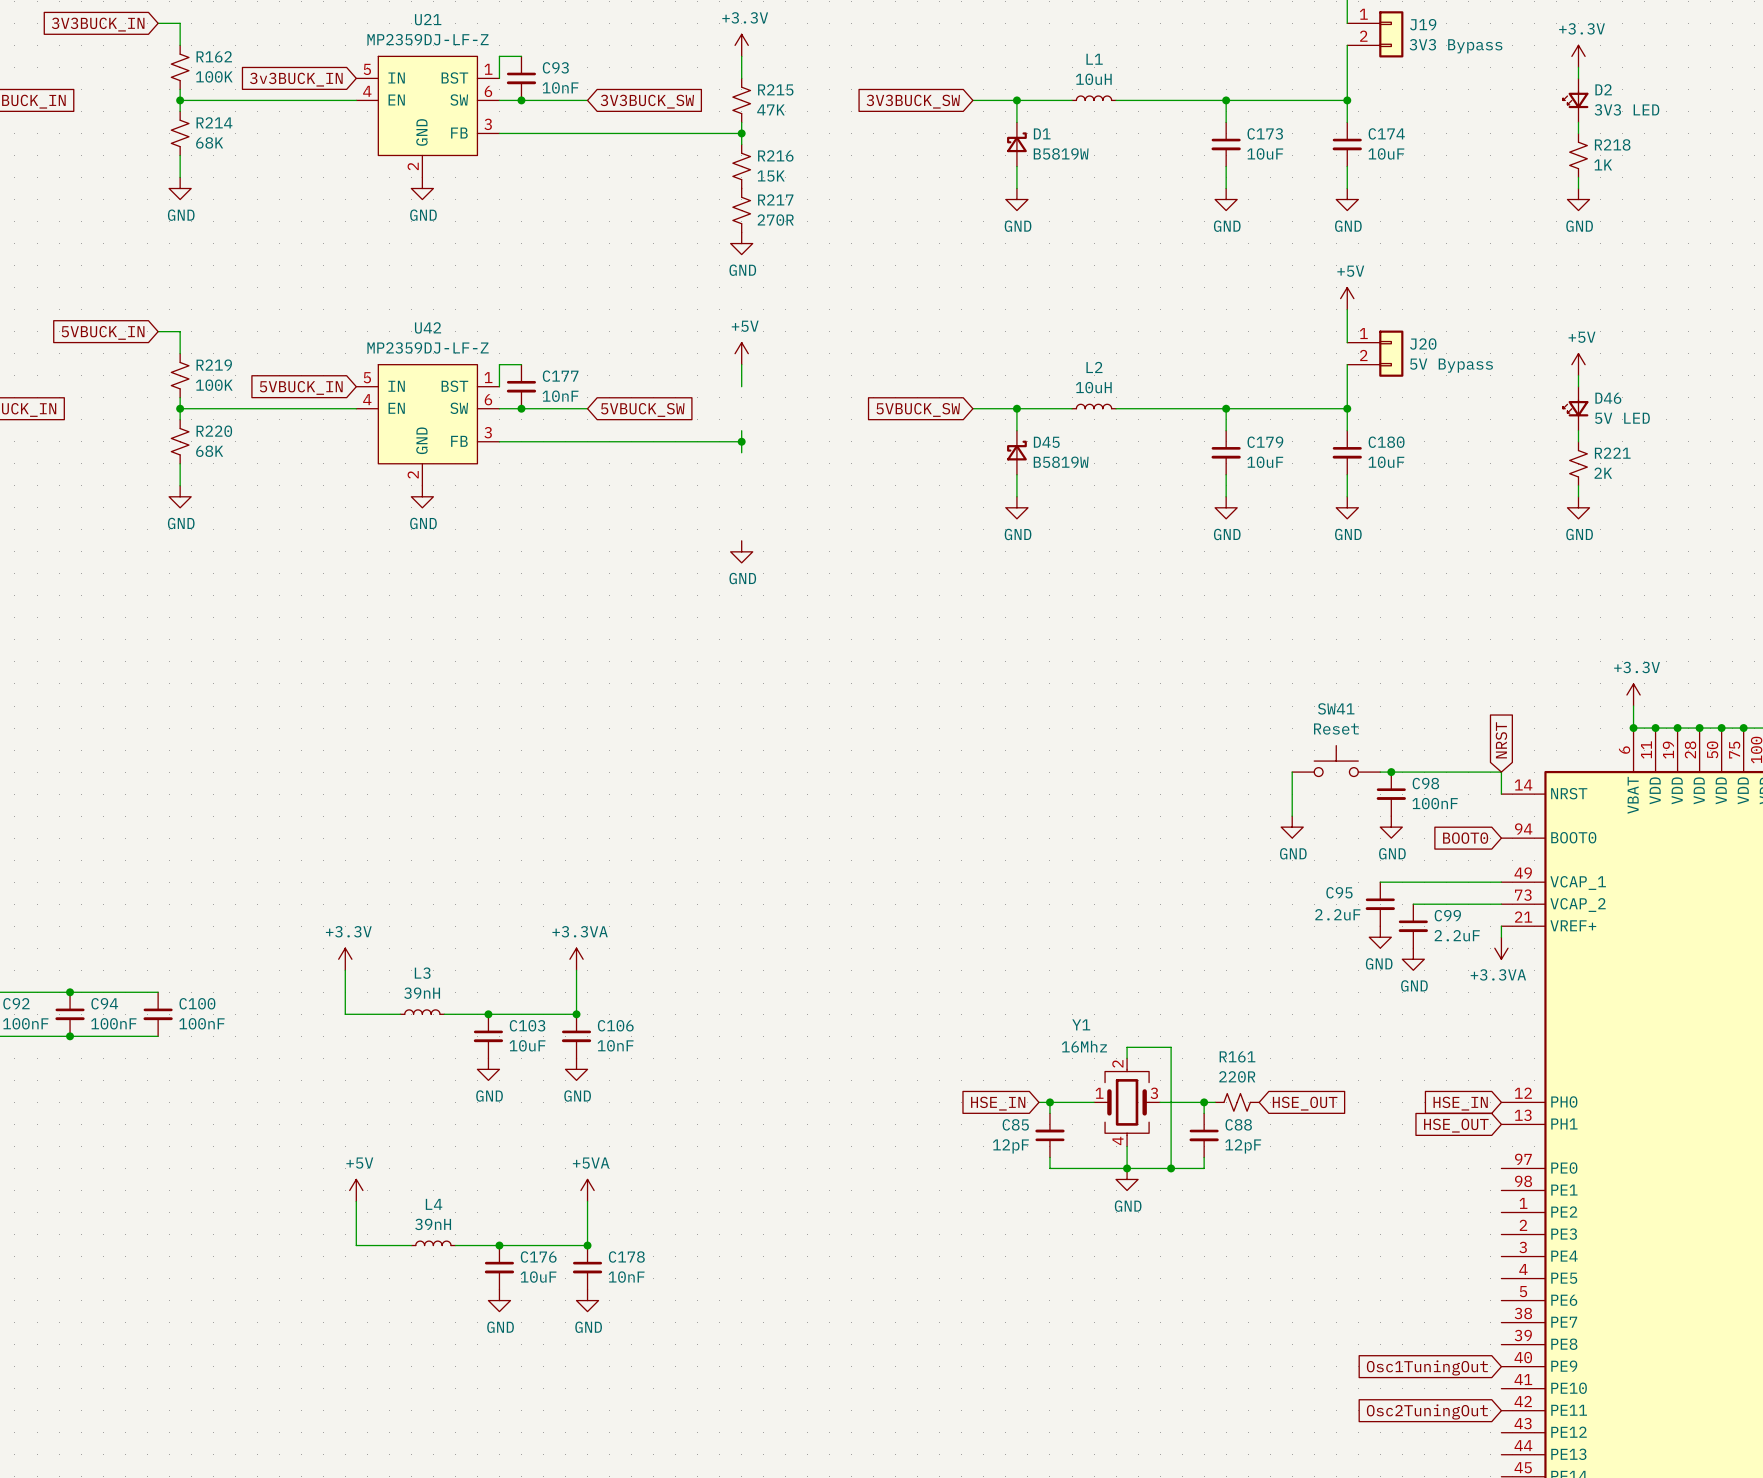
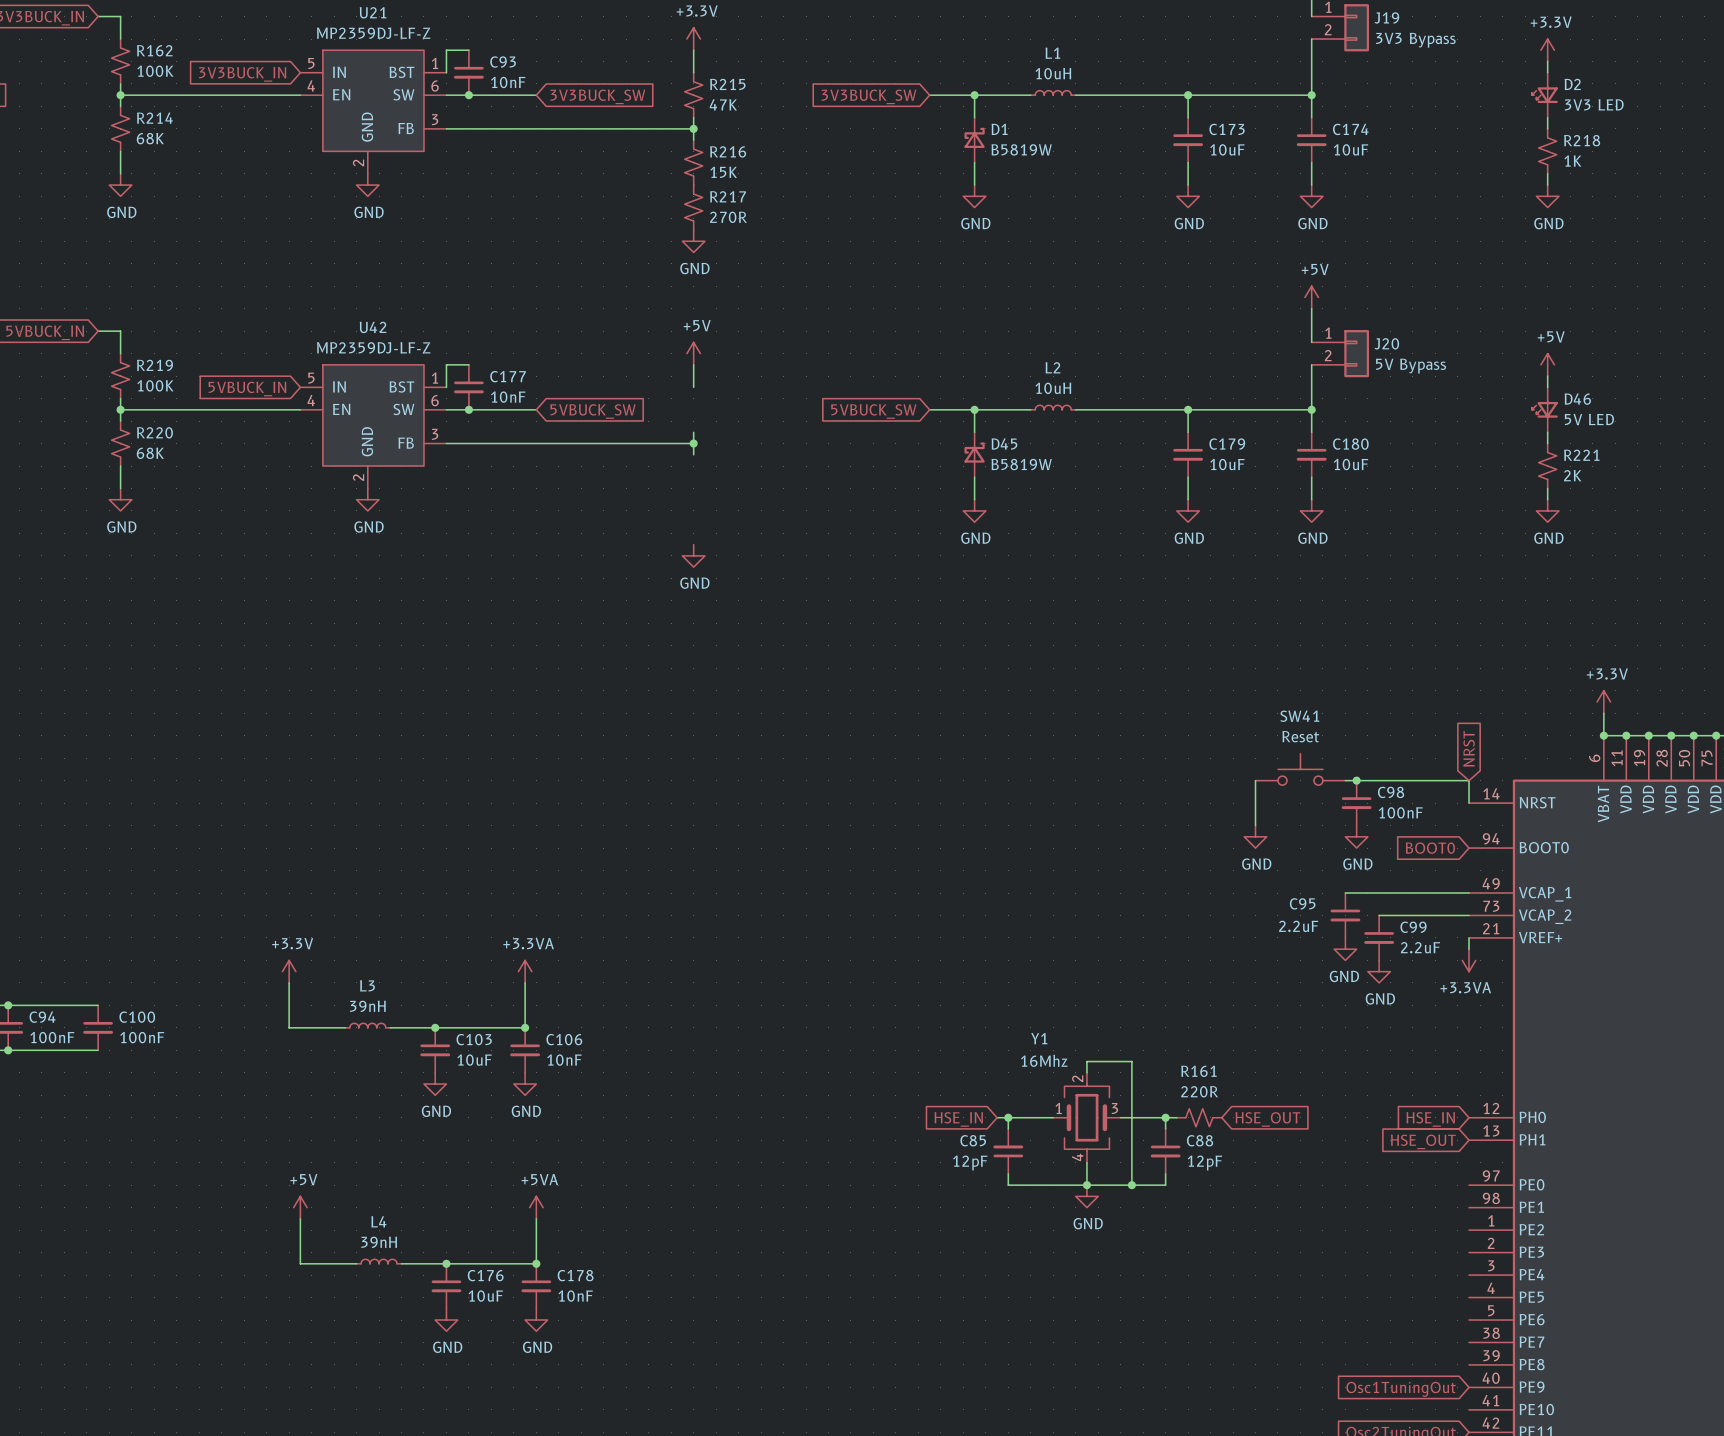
global label: 3v3BUCK_IN (296, 79) -> 3V3BUCK_IN (242, 74)

